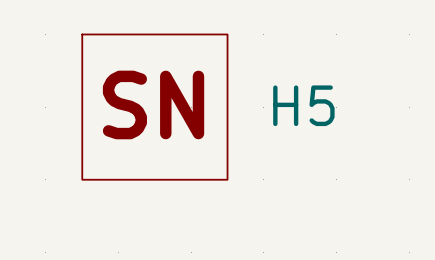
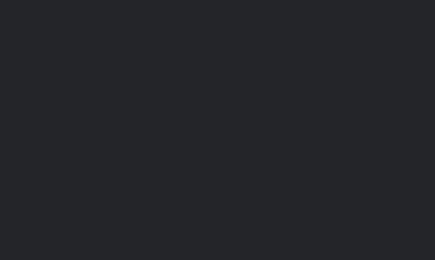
H5: (154, 107) -> none

